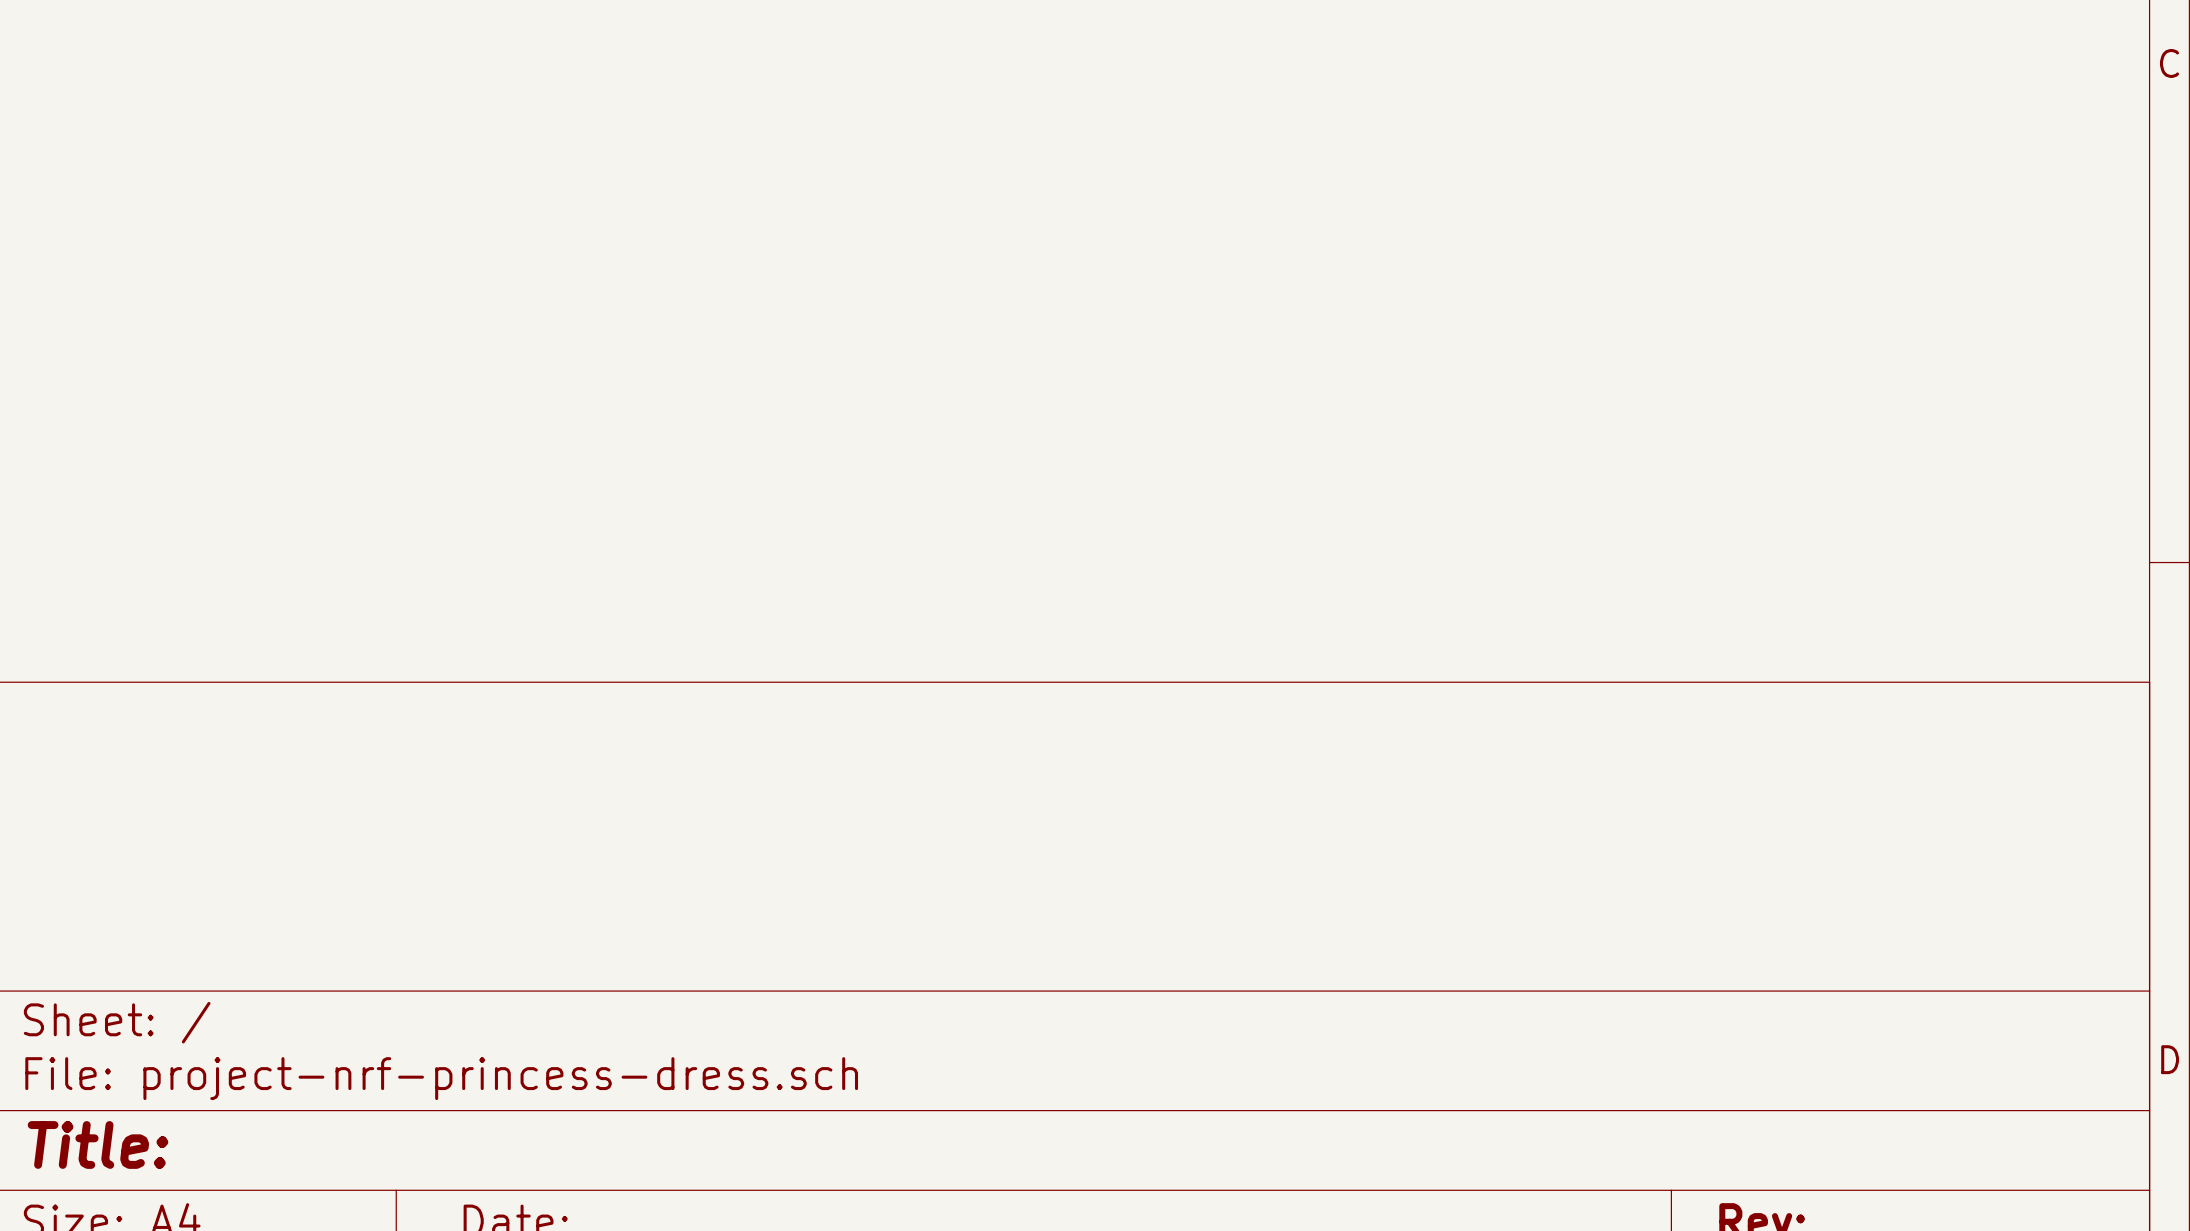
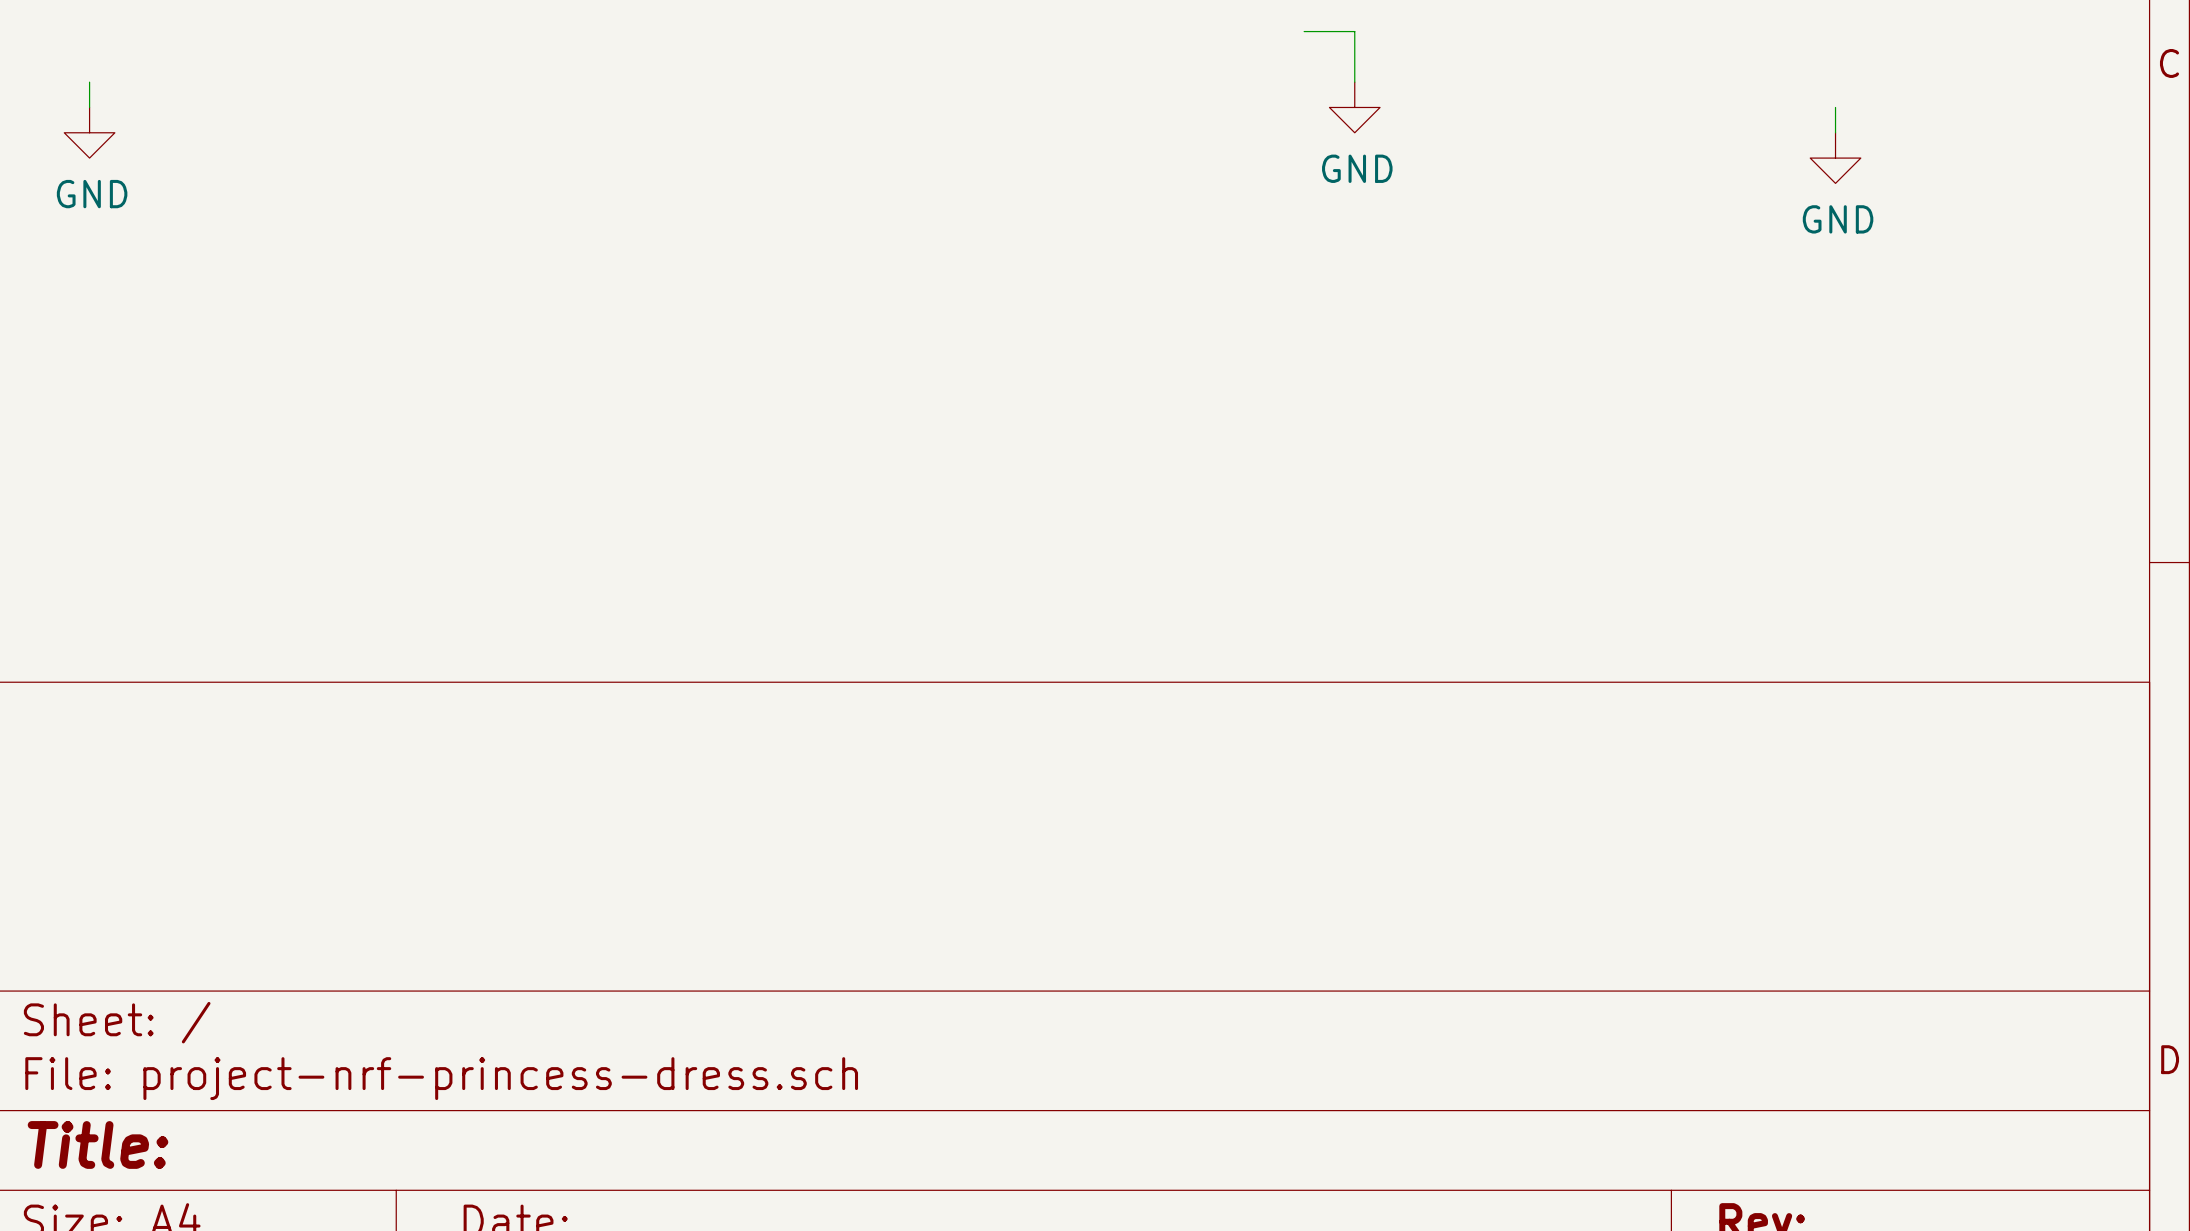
wire: none -> (1304, 31) (1354, 31) (1354, 82)
wire: none -> (89, 82) (89, 107)
power symbol: none -> GND (1354, 107)
wire: none -> (1835, 107) (1835, 132)
power symbol: none -> GND (89, 132)
power symbol: none -> GND (1835, 158)

